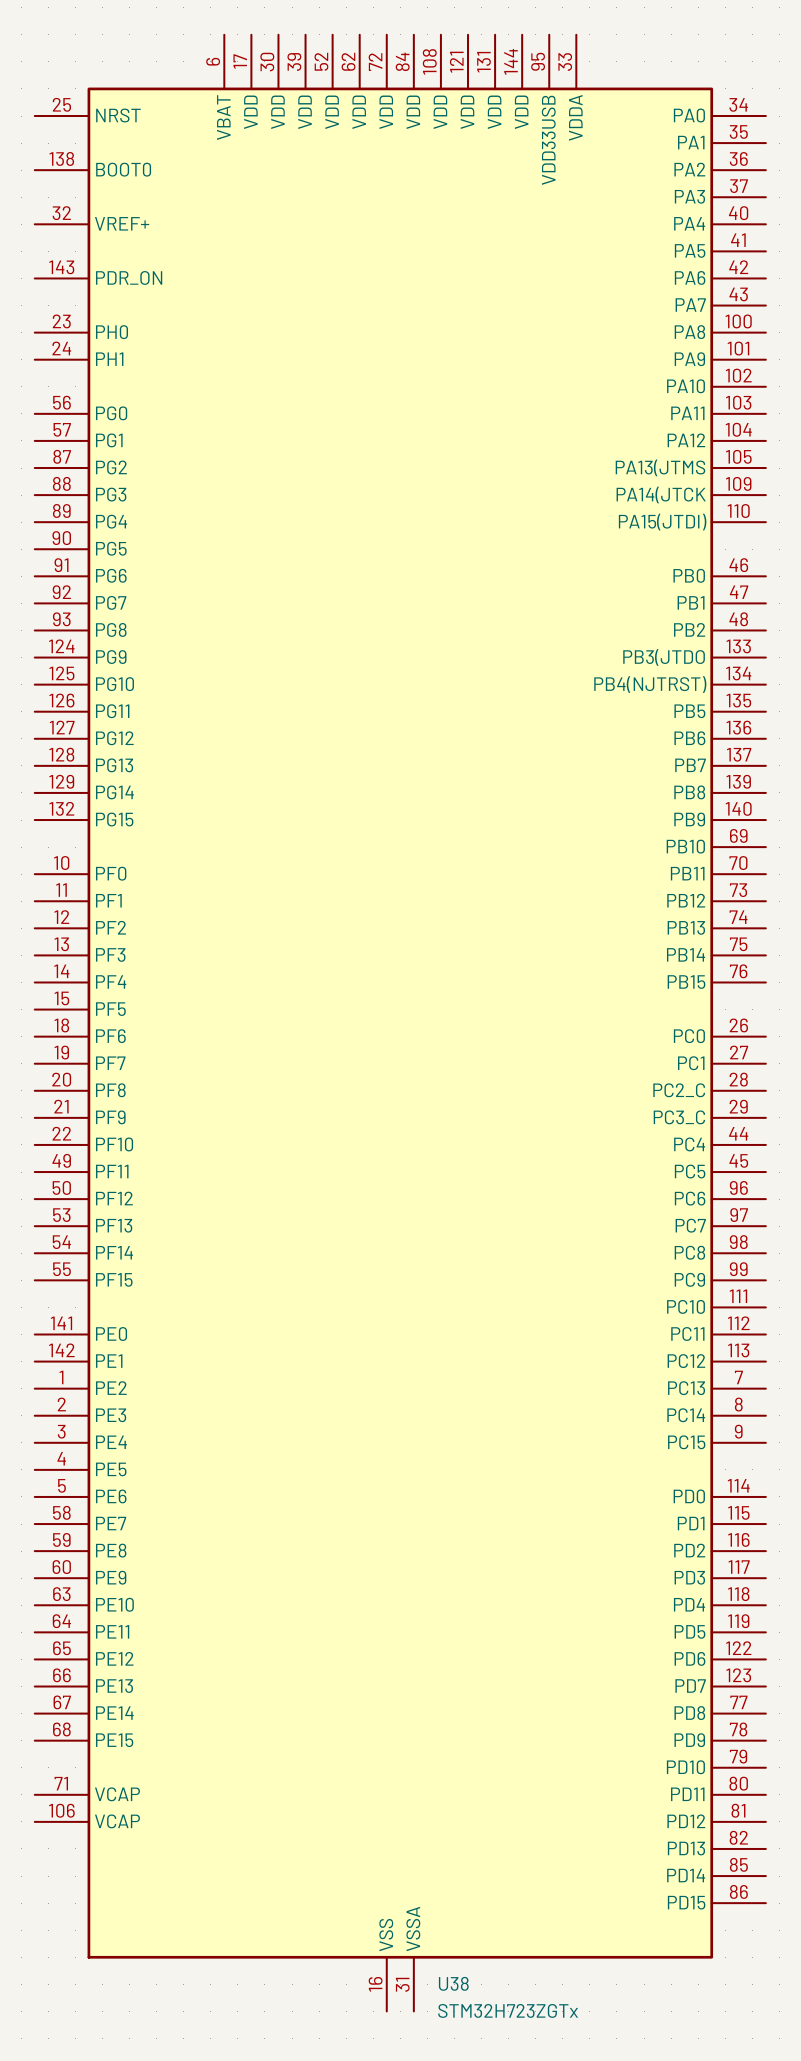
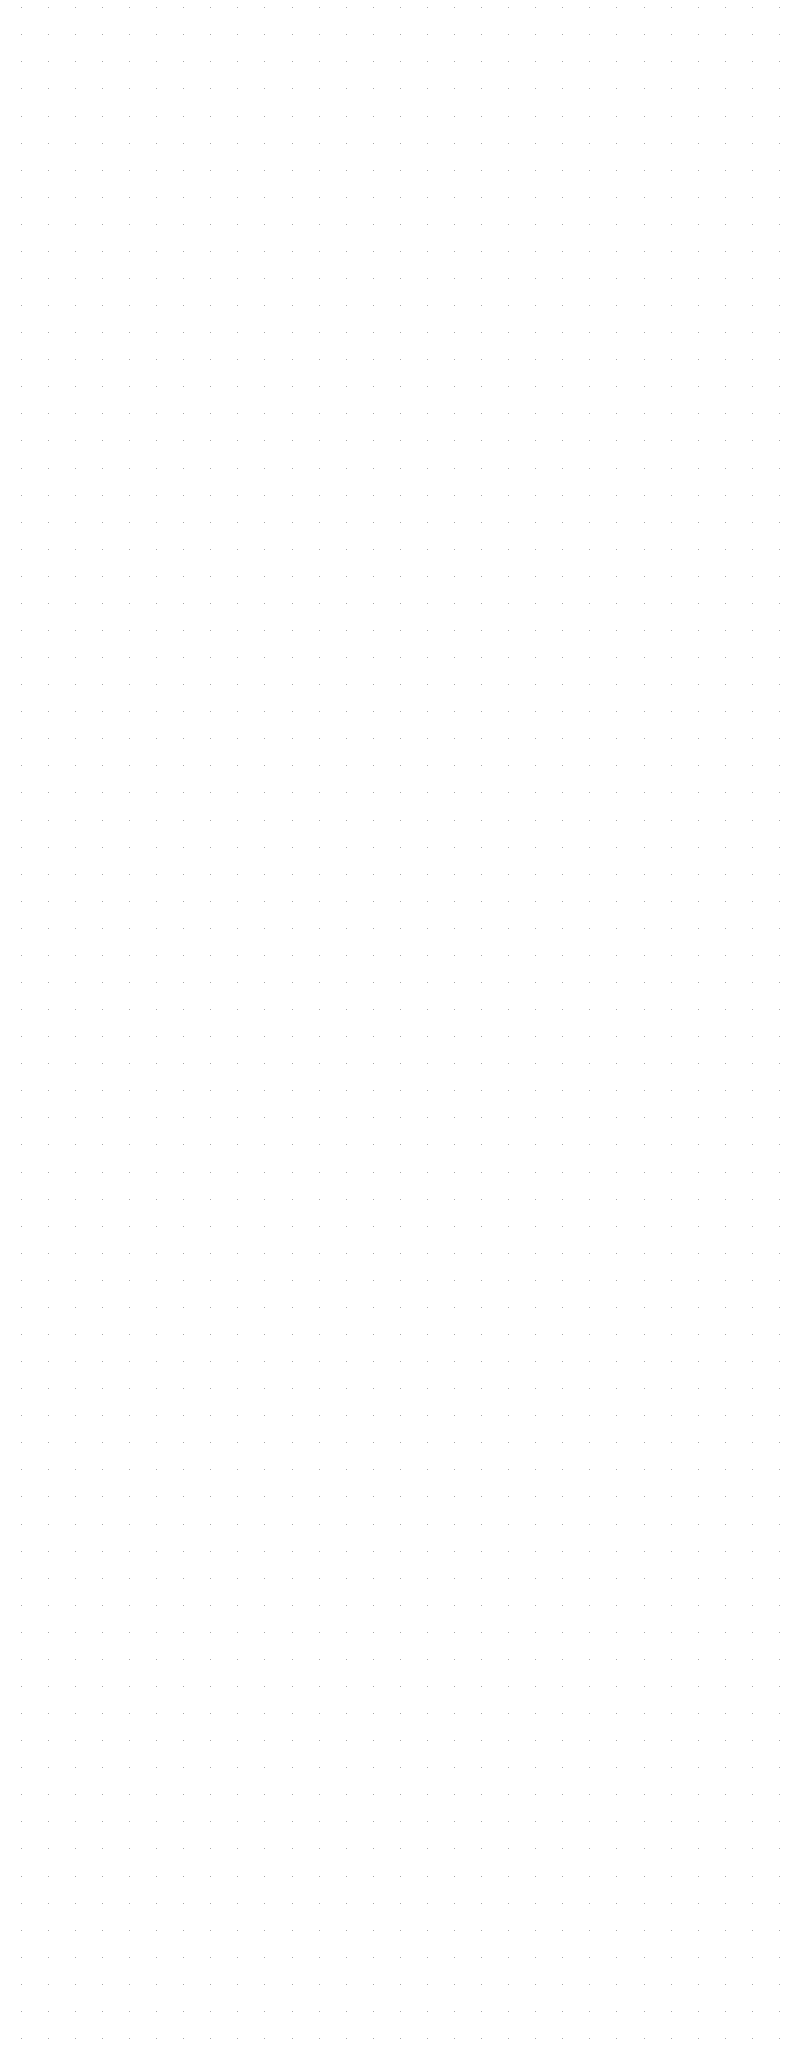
U38: STM32H723ZGTx (400, 1023) -> none

